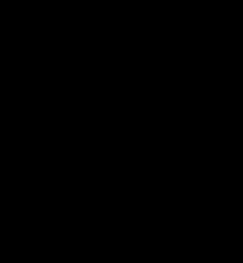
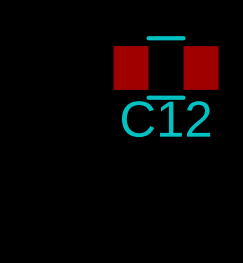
C12: none -> (166, 67)

